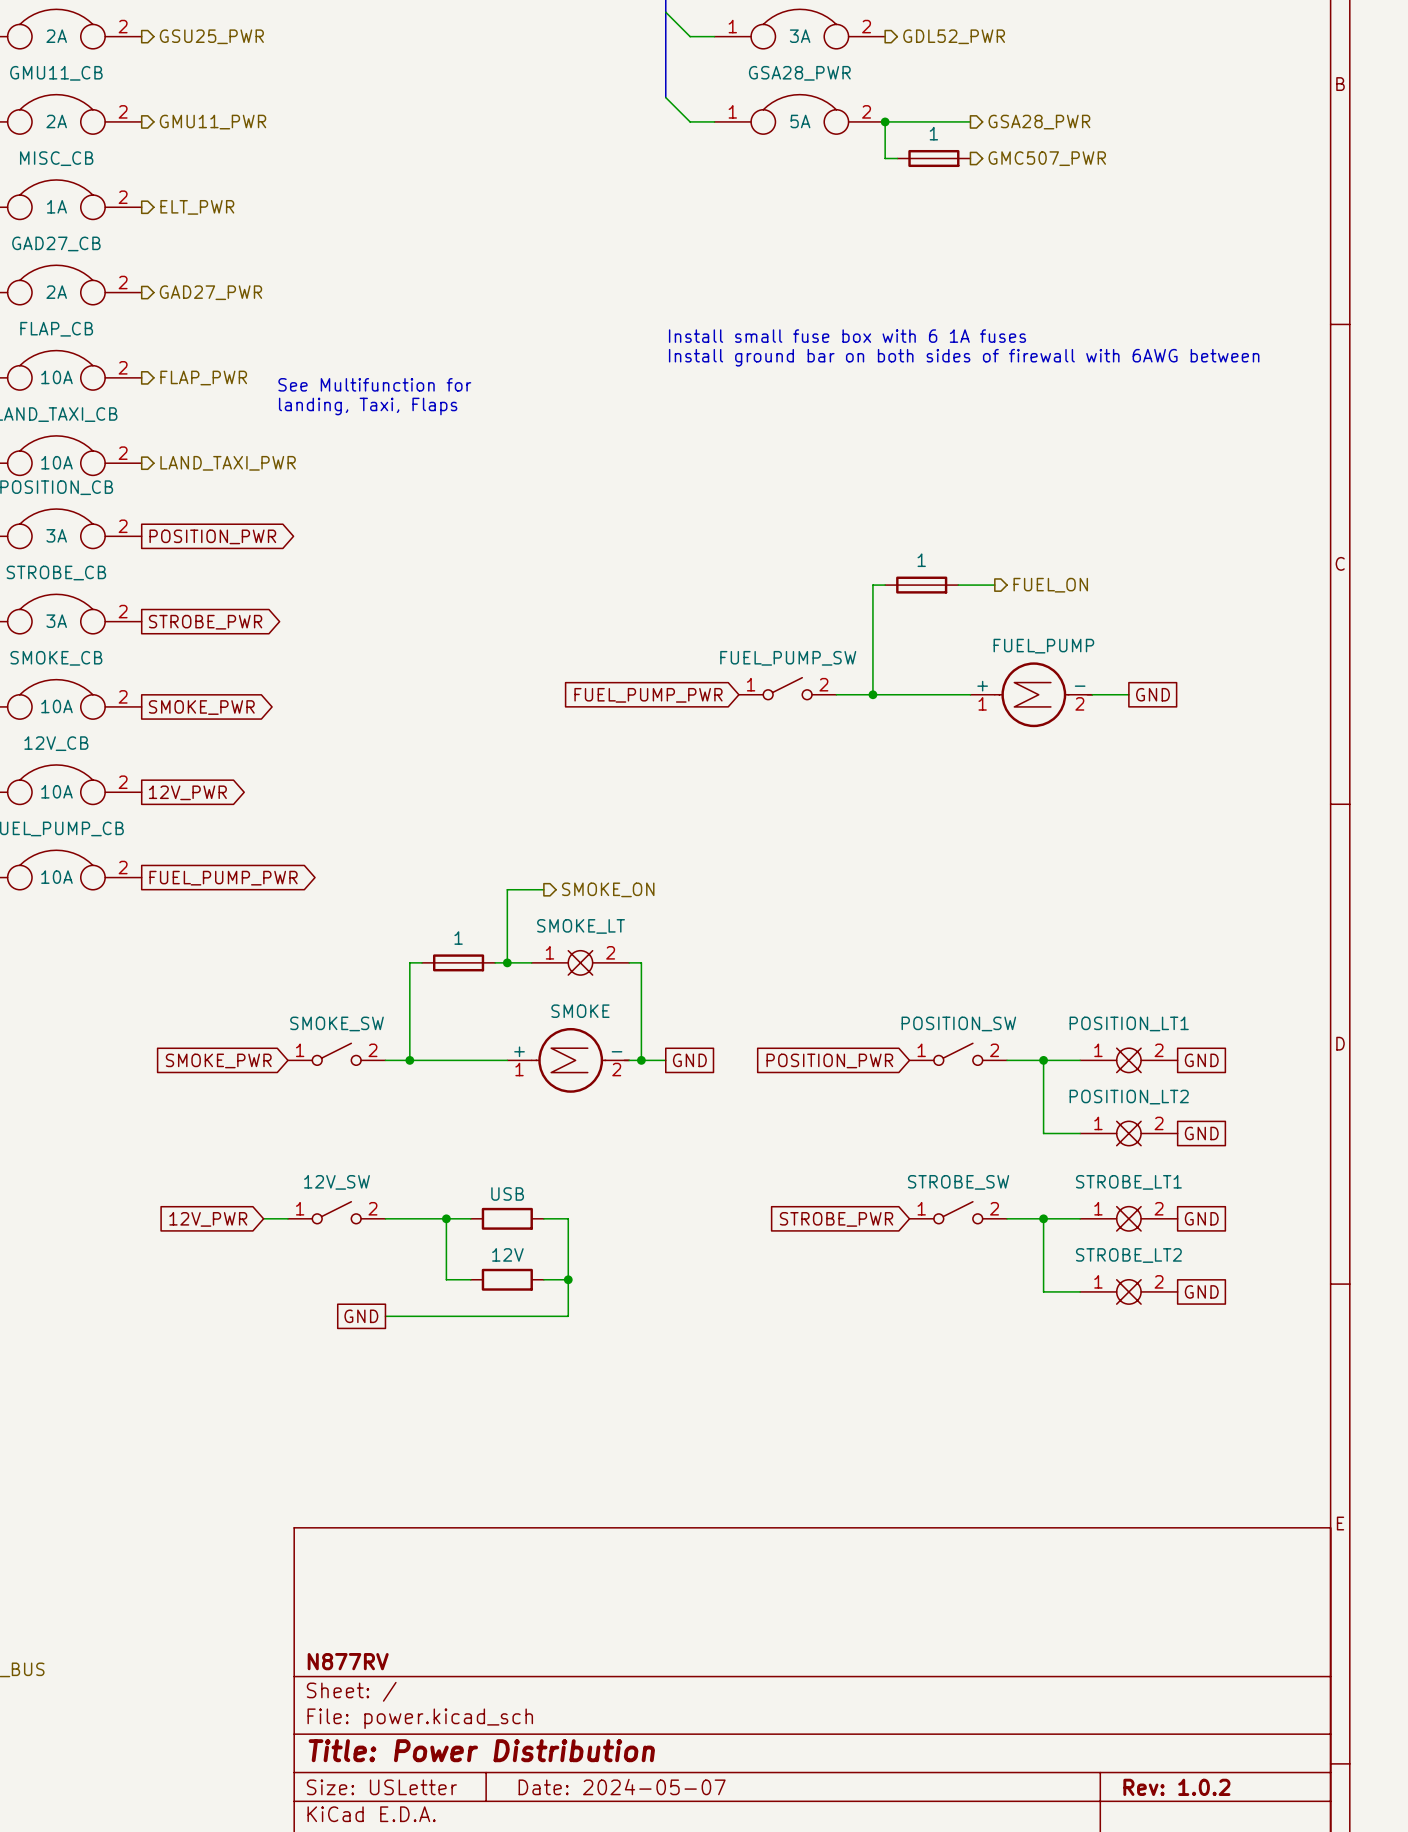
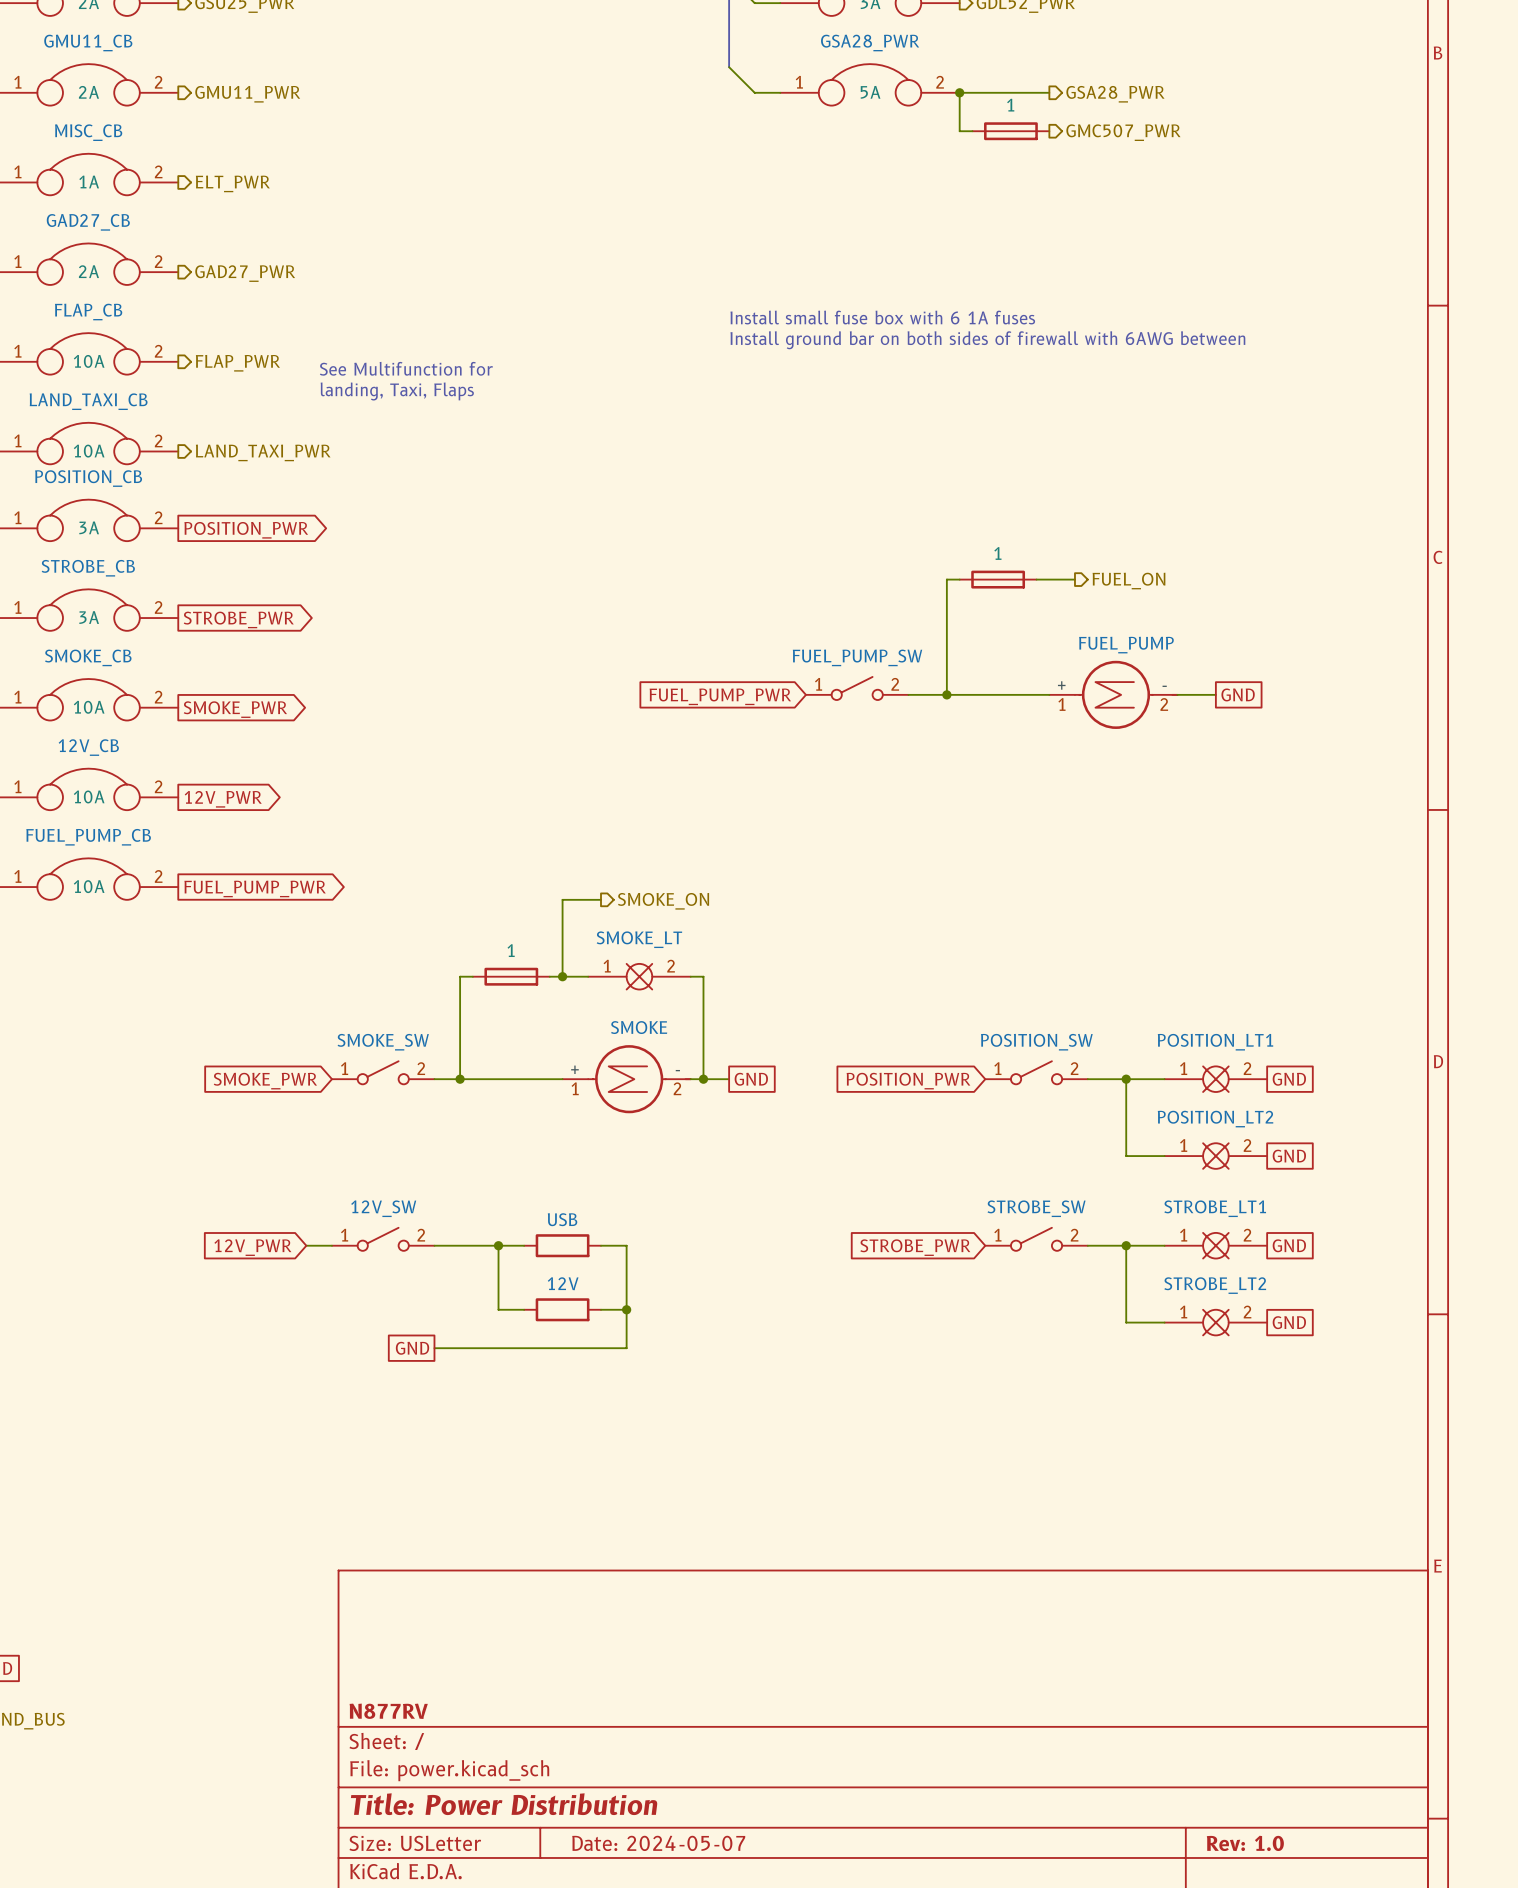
title block: Rev: 1.0.2 (1176, 1787) -> Rev: 1.0 (1245, 1843)

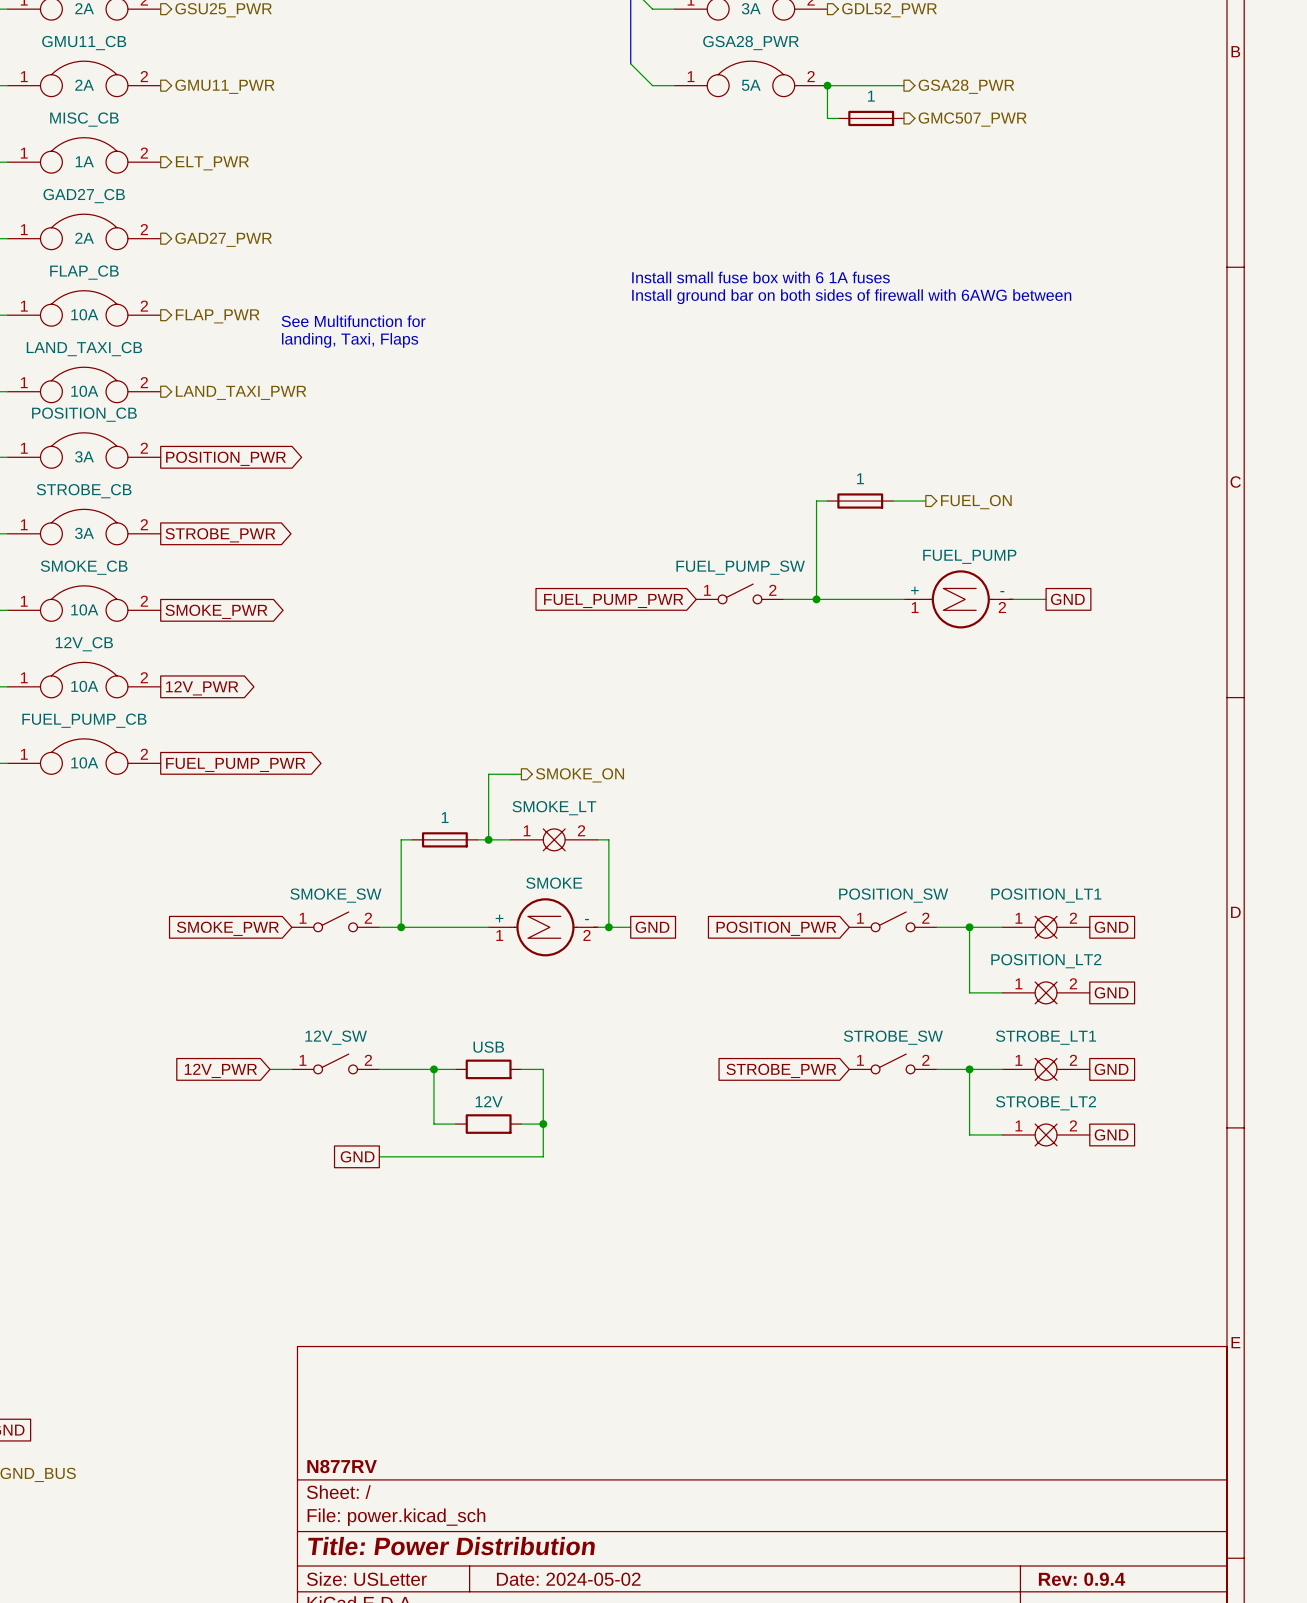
title block: Date: 2024-05-07 (658, 1843) -> Date: 2024-05-02 (568, 1579)
title block: Rev: 1.0 (1245, 1843) -> Rev: 0.9.4 (1082, 1579)

